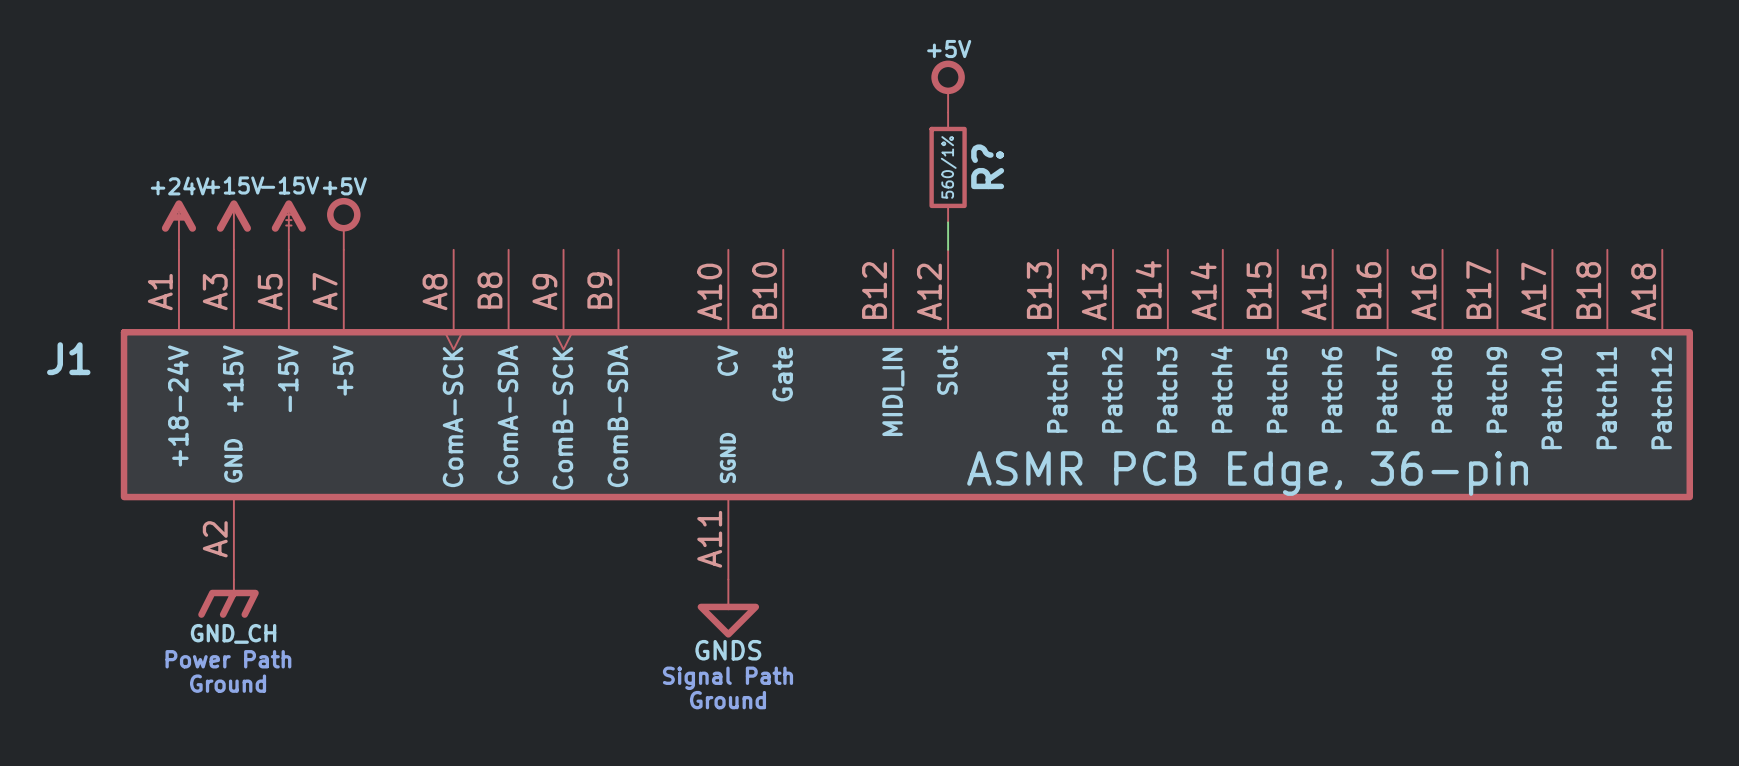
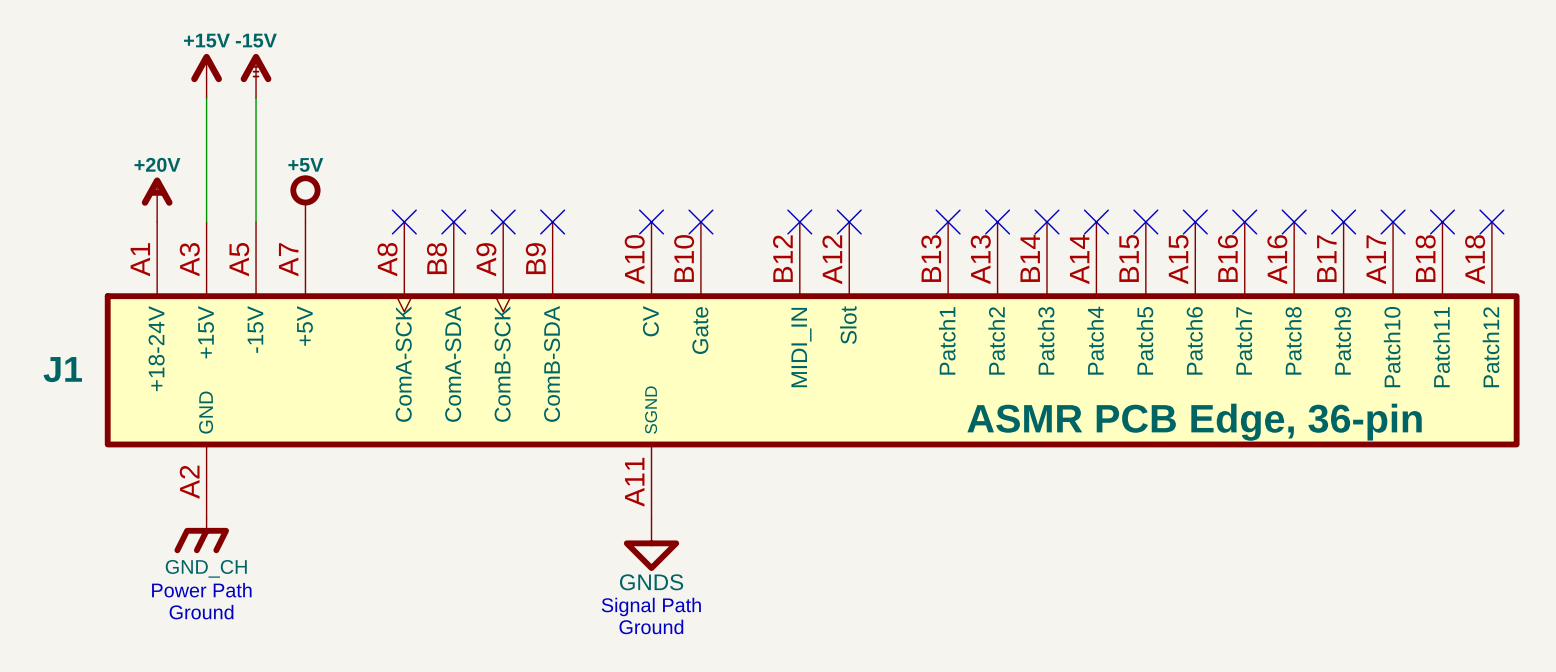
power symbol: +5V (948, 86) -> none
wire: none -> (206, 98) (206, 222)
wire: none -> (256, 98) (256, 222)
R?: 560/1% (948, 167) -> none
wire: (948, 222) (948, 249) -> none
power symbol: +24V (178, 225) -> +20V (157, 199)
power symbol position: +15V (233, 225) -> +15V (206, 76)
power symbol position: -15V (288, 225) -> -15V (256, 76)
no-connect mark: none -> (404, 222)
no-connect mark: none -> (453, 222)
no-connect mark: none -> (503, 222)
no-connect mark: none -> (552, 222)
no-connect mark: none -> (651, 222)
no-connect mark: none -> (700, 222)
no-connect mark: none -> (799, 222)
no-connect mark: none -> (849, 222)
no-connect mark: none -> (948, 222)
no-connect mark: none -> (997, 222)
no-connect mark: none -> (1046, 222)
no-connect mark: none -> (1096, 222)
no-connect mark: none -> (1145, 222)
no-connect mark: none -> (1195, 222)
no-connect mark: none -> (1244, 222)
no-connect mark: none -> (1294, 222)
no-connect mark: none -> (1343, 222)
no-connect mark: none -> (1393, 222)
no-connect mark: none -> (1442, 222)
no-connect mark: none -> (1491, 222)
J1 name position: J1 (68, 358) -> J1 (62, 369)
J1 text position: ASMR PCB Edge, 36-pin (1247, 473) -> ASMR PCB Edge, 36-pin (1194, 422)

